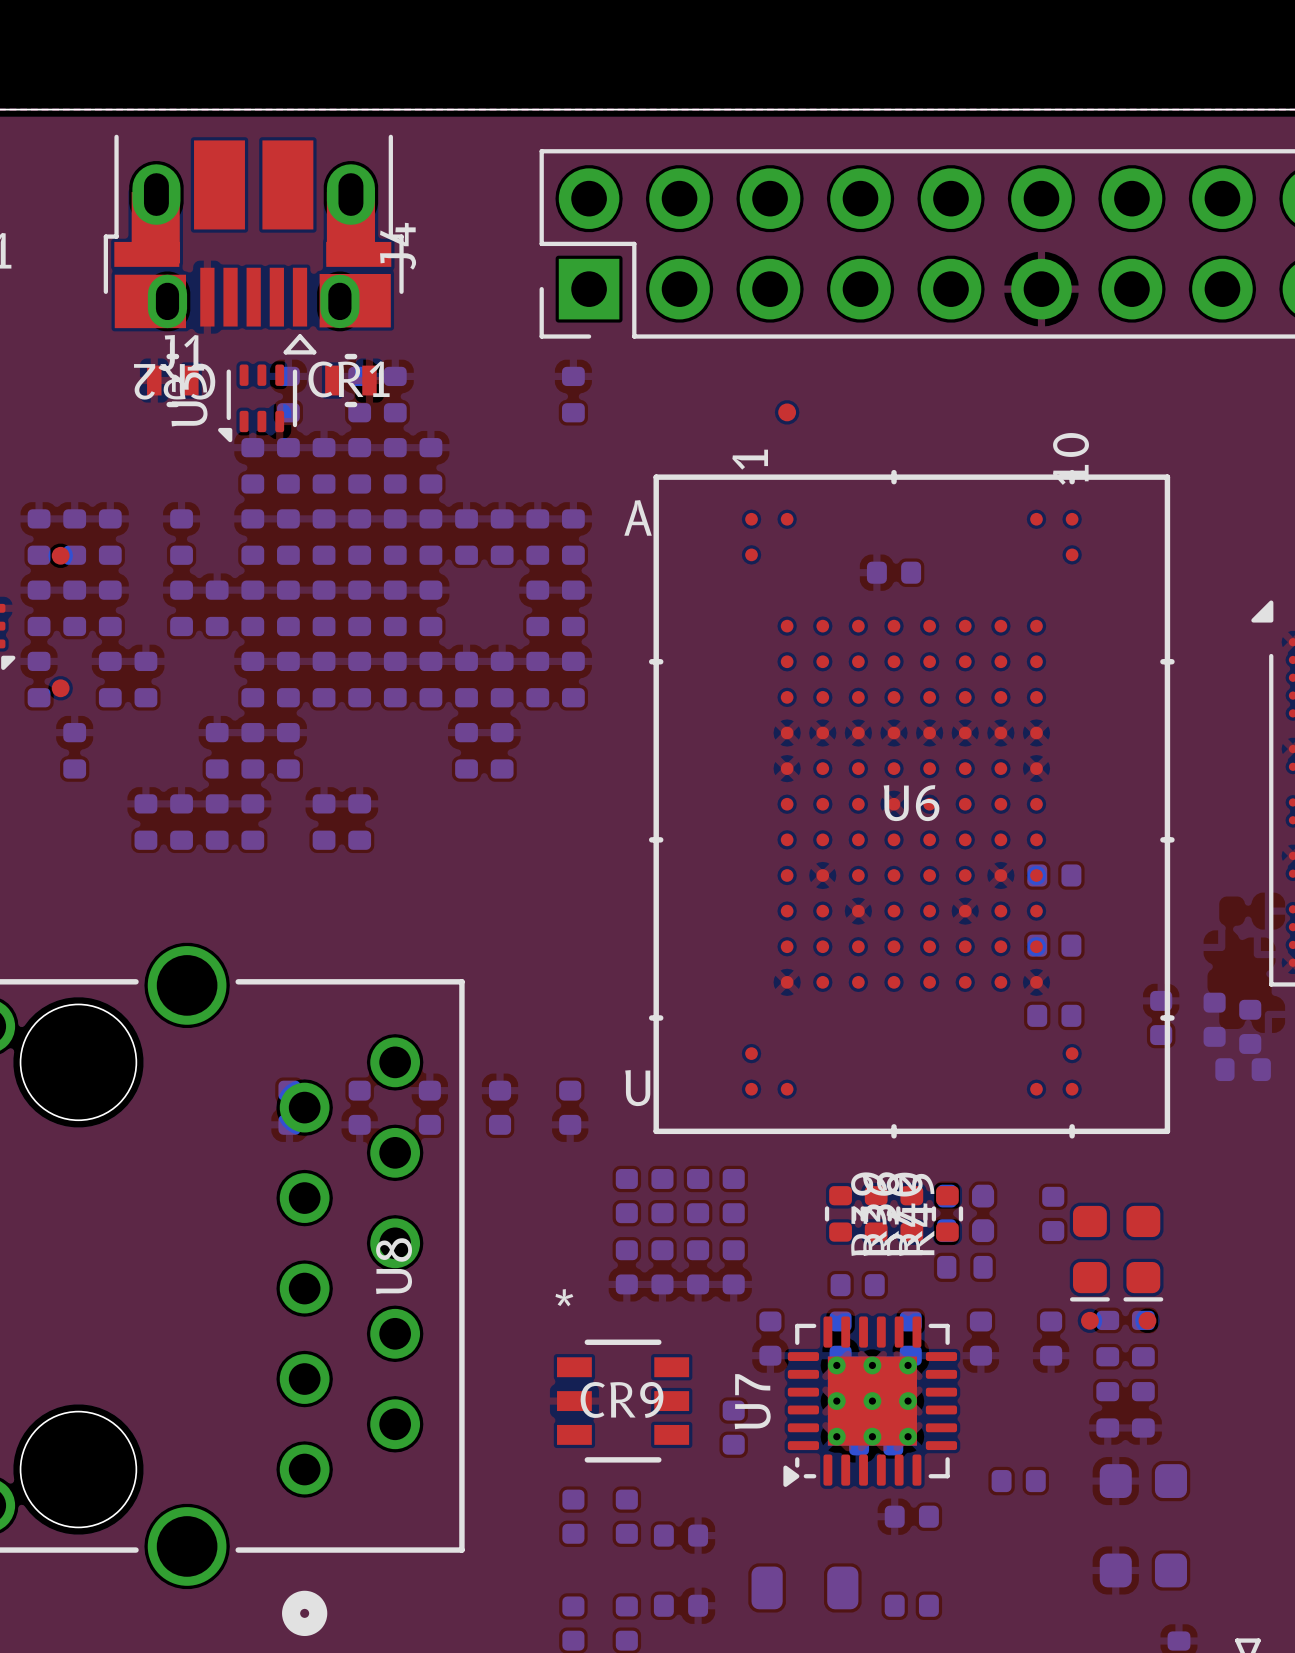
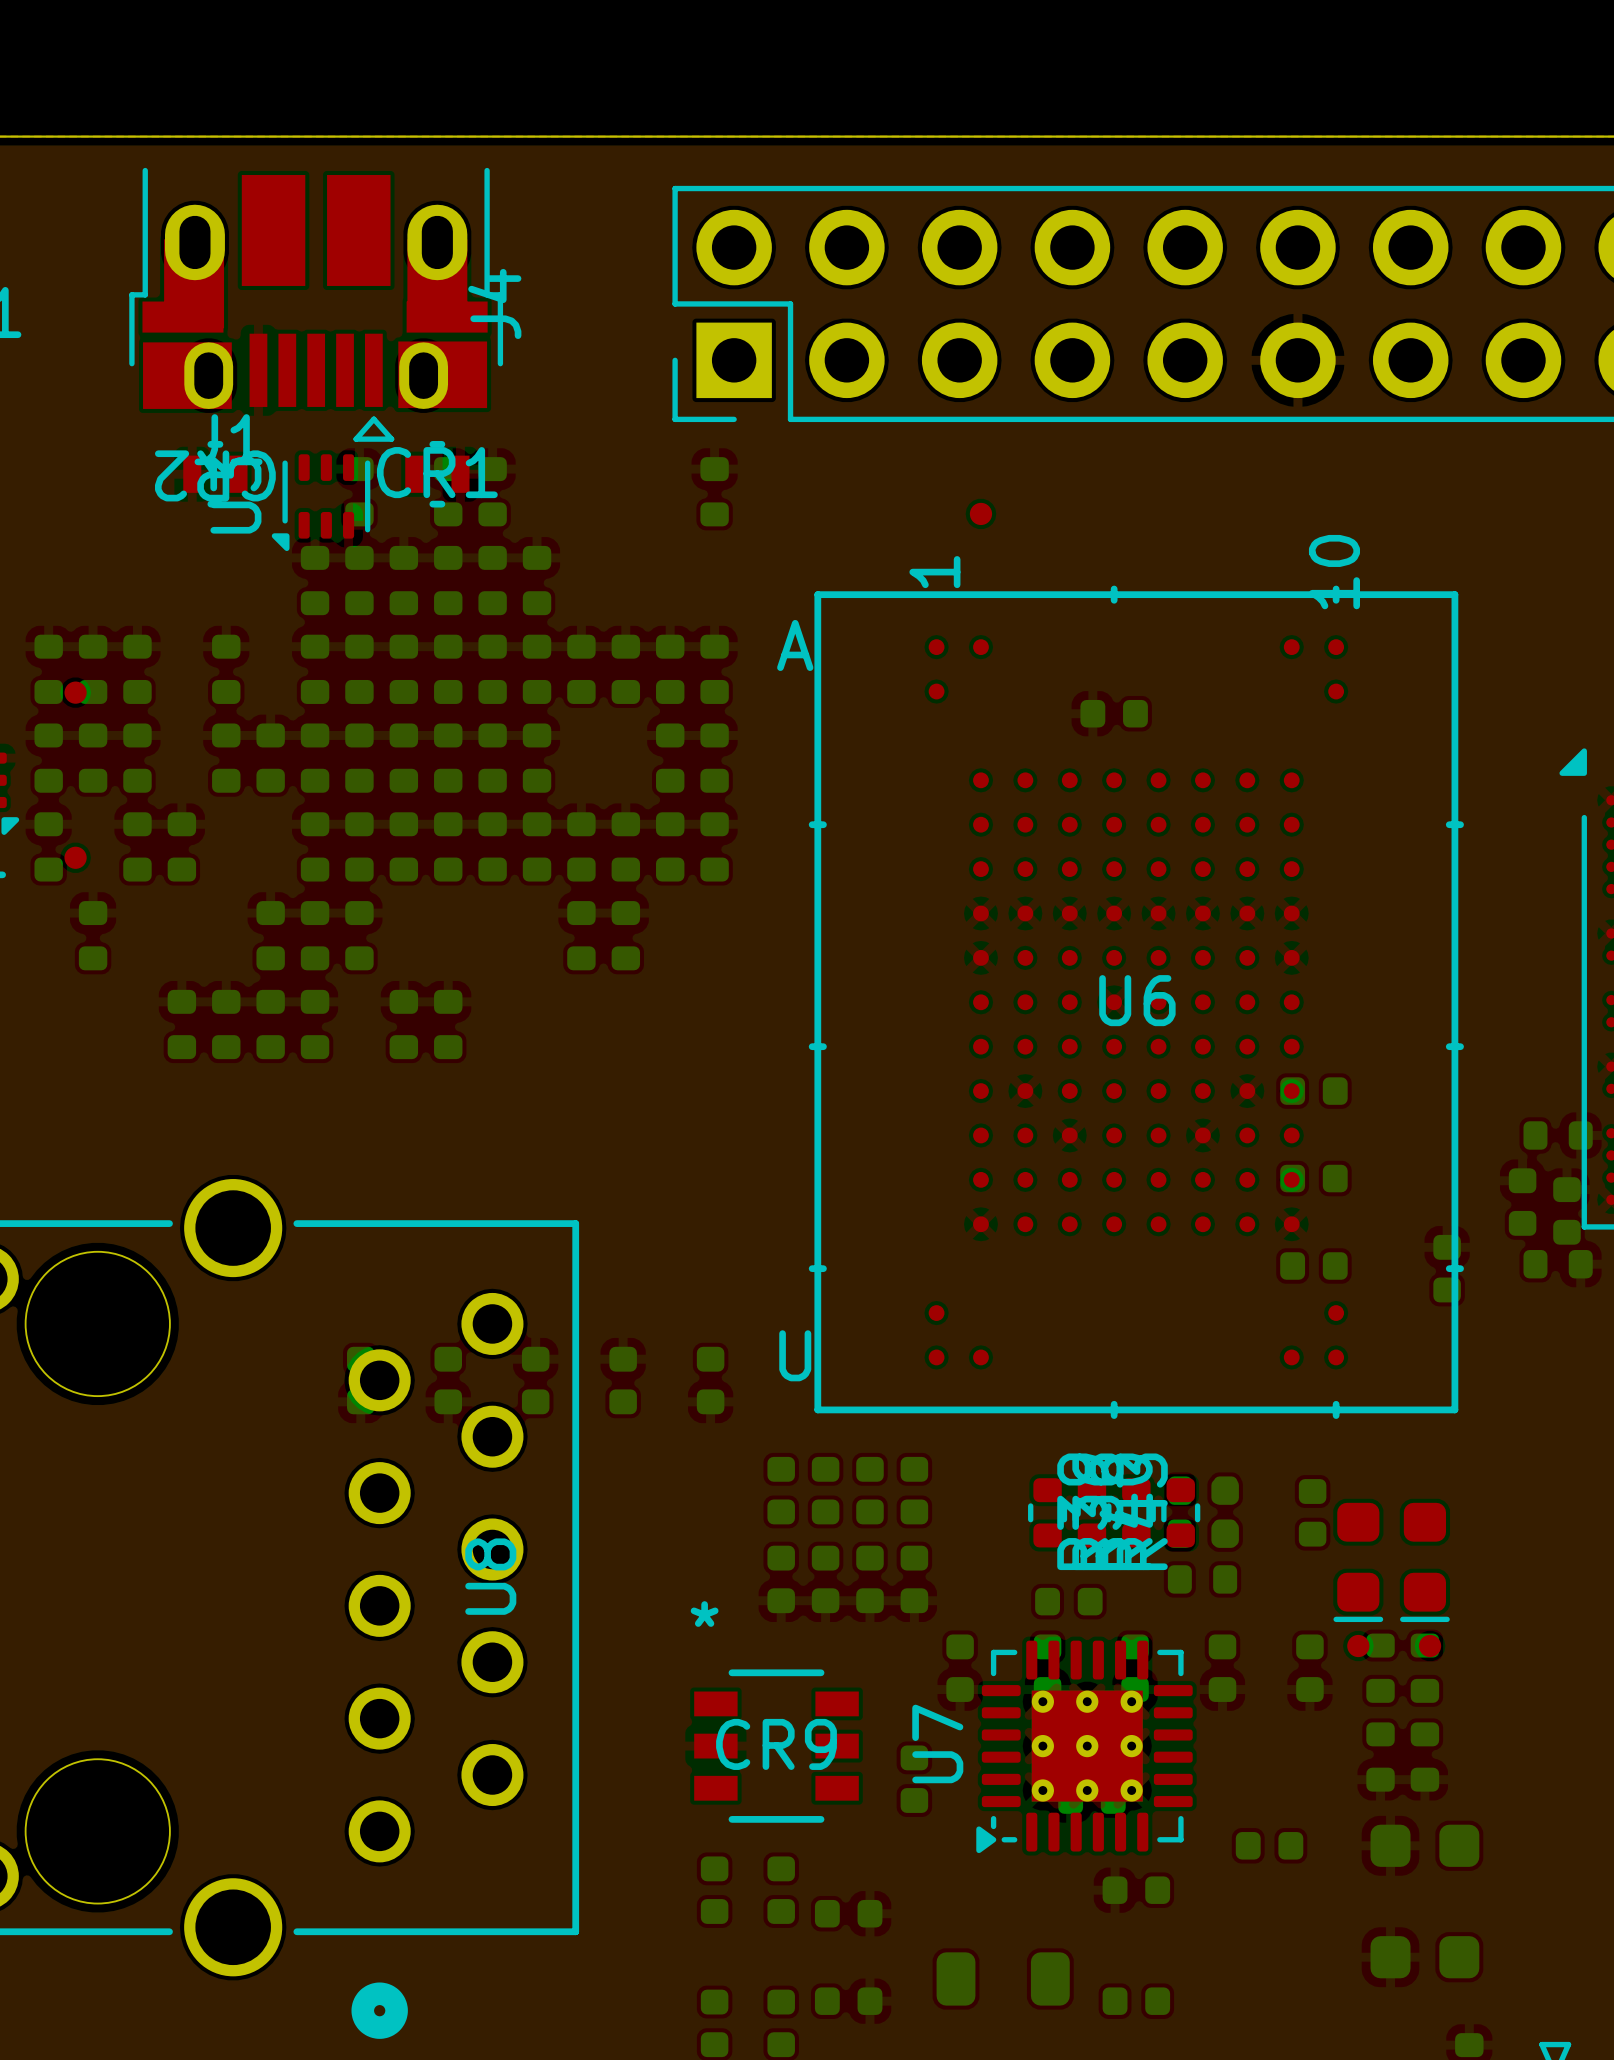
part: none -> (1558, 1135)
part: none -> (1522, 1202)
part: none -> (1566, 1210)
part footprint: [1239, 999, 1262, 1054] -> [1523, 1250, 1593, 1279]
part: (1214, 1019) -> none
part: (1243, 1069) -> none

